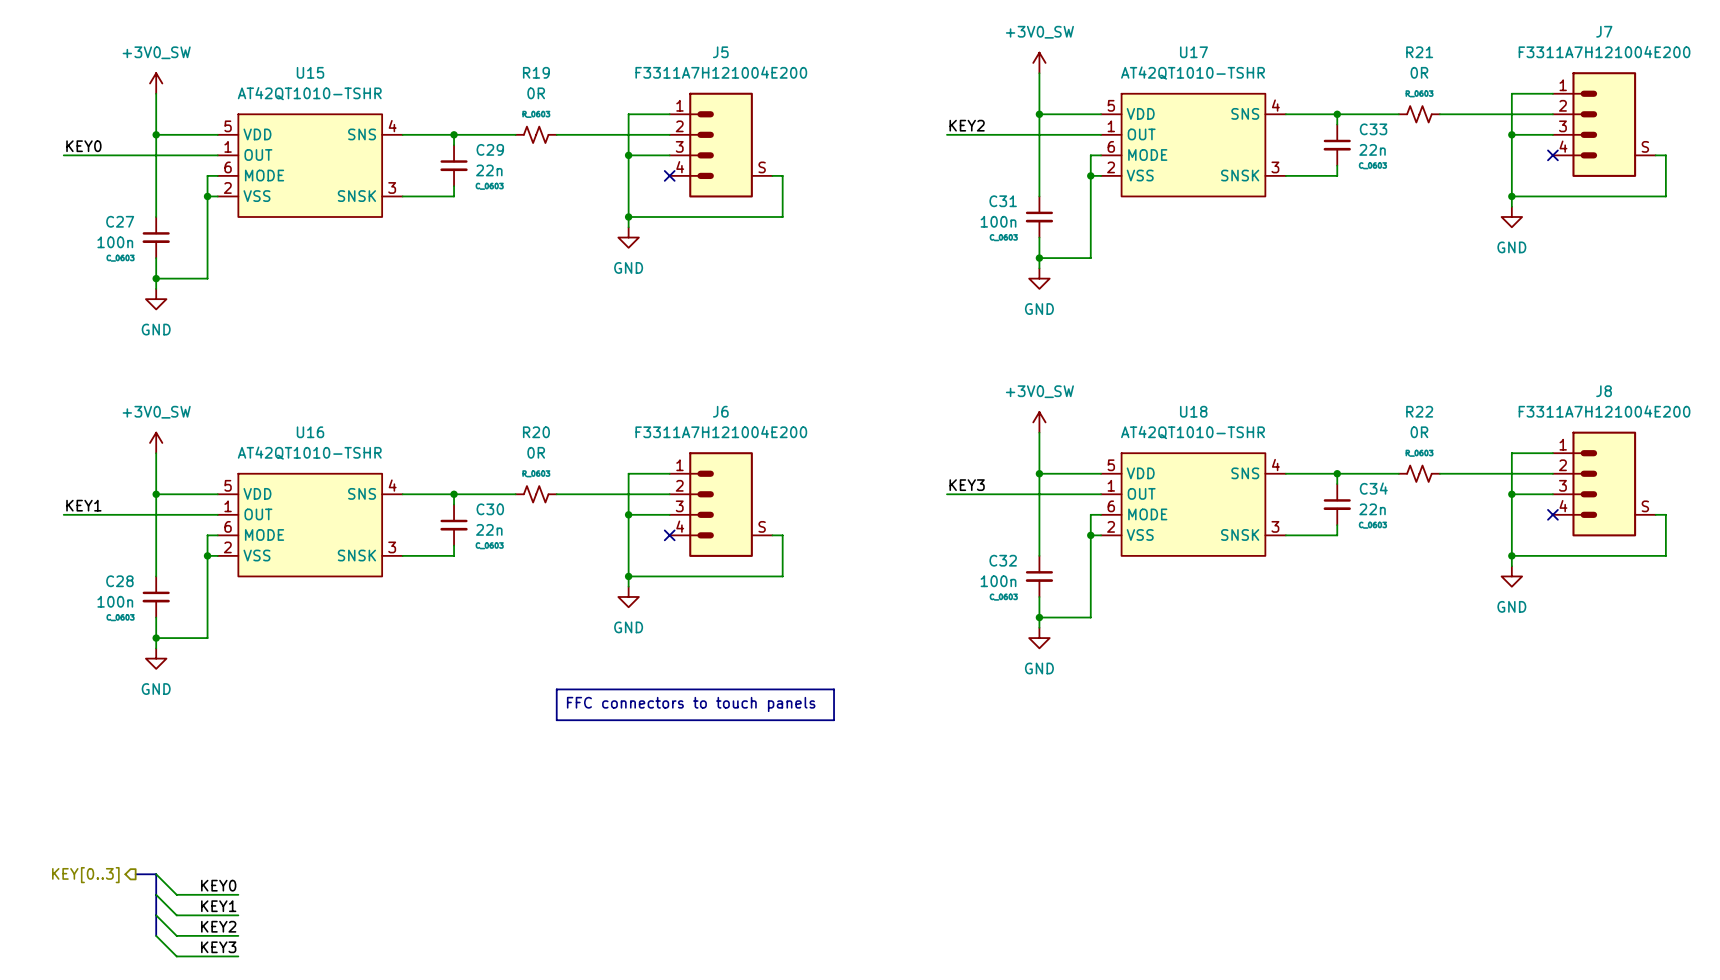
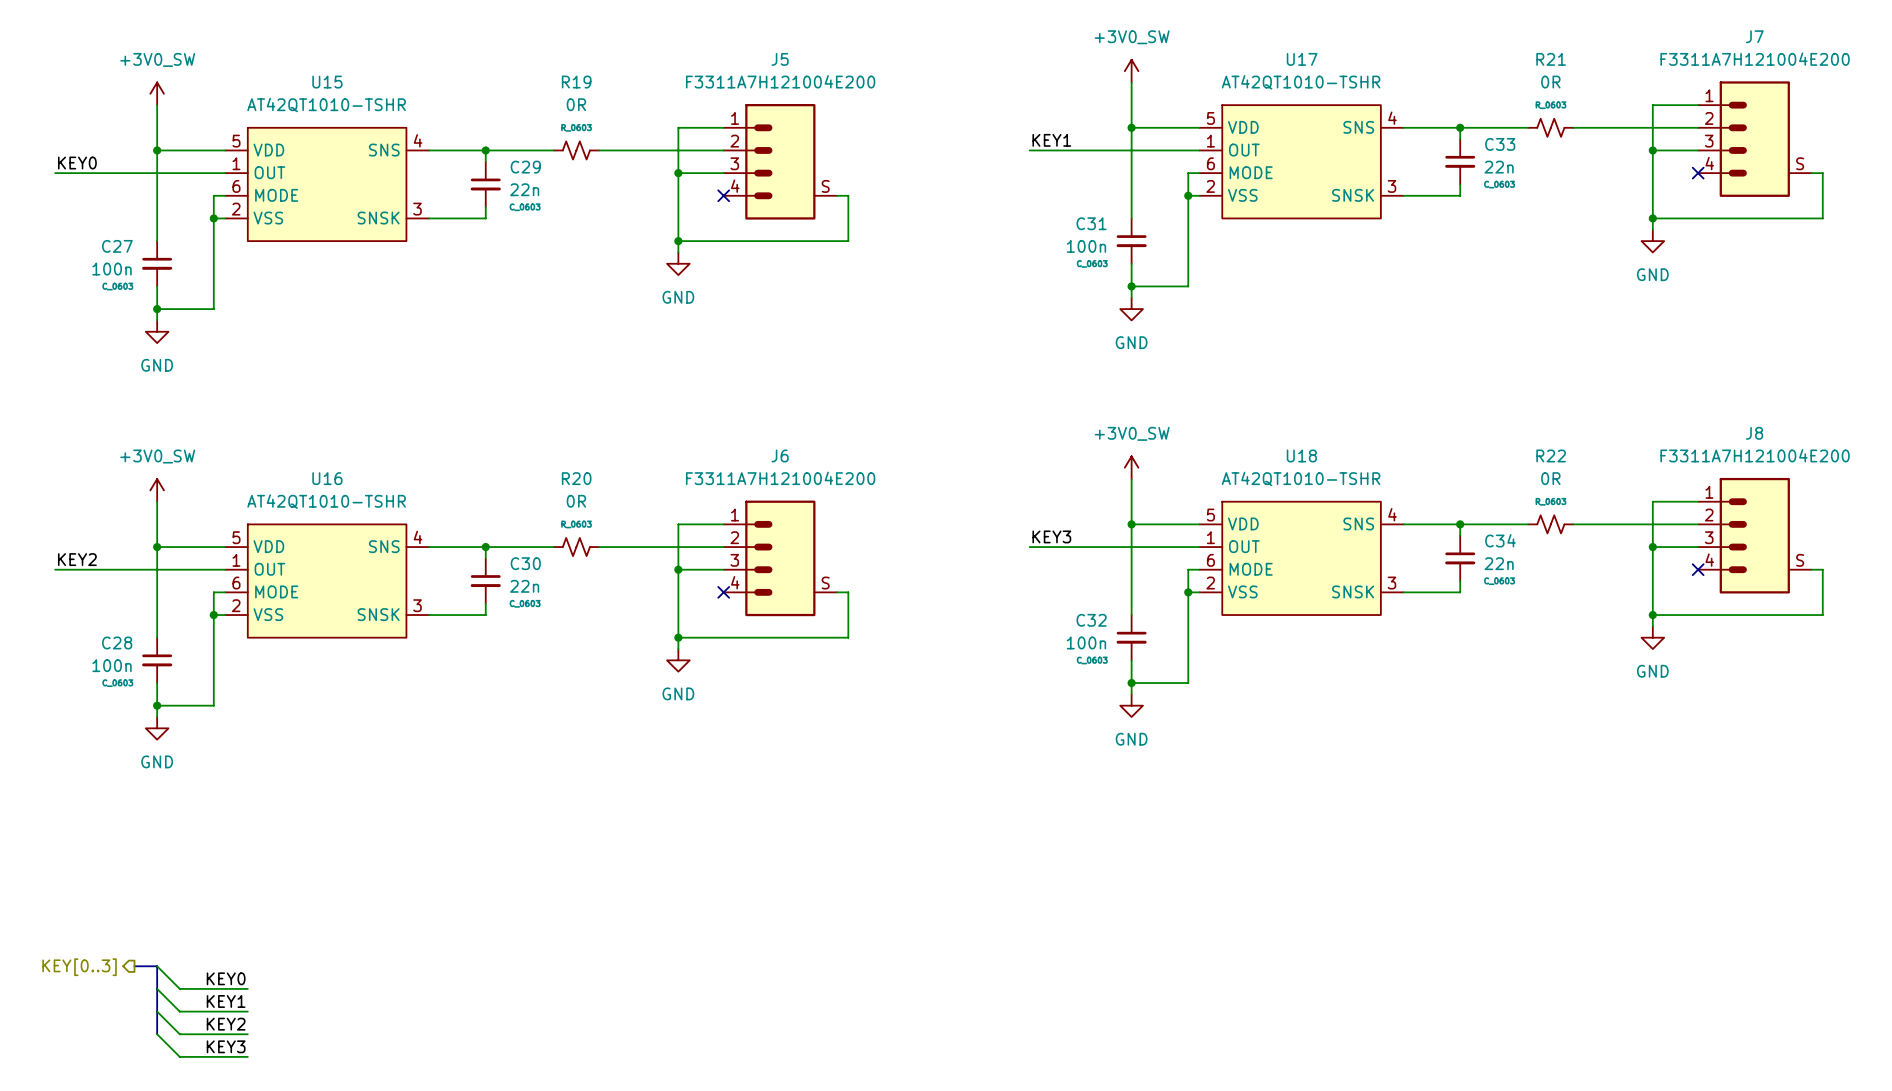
label: KEY2 (967, 125) -> KEY1 (1051, 140)
label: KEY1 (83, 505) -> KEY2 (77, 559)
line: (556, 689) (834, 689) (834, 720) (556, 720) (556, 689) -> none
text: FFC connectors to touch panels (691, 704) -> none

